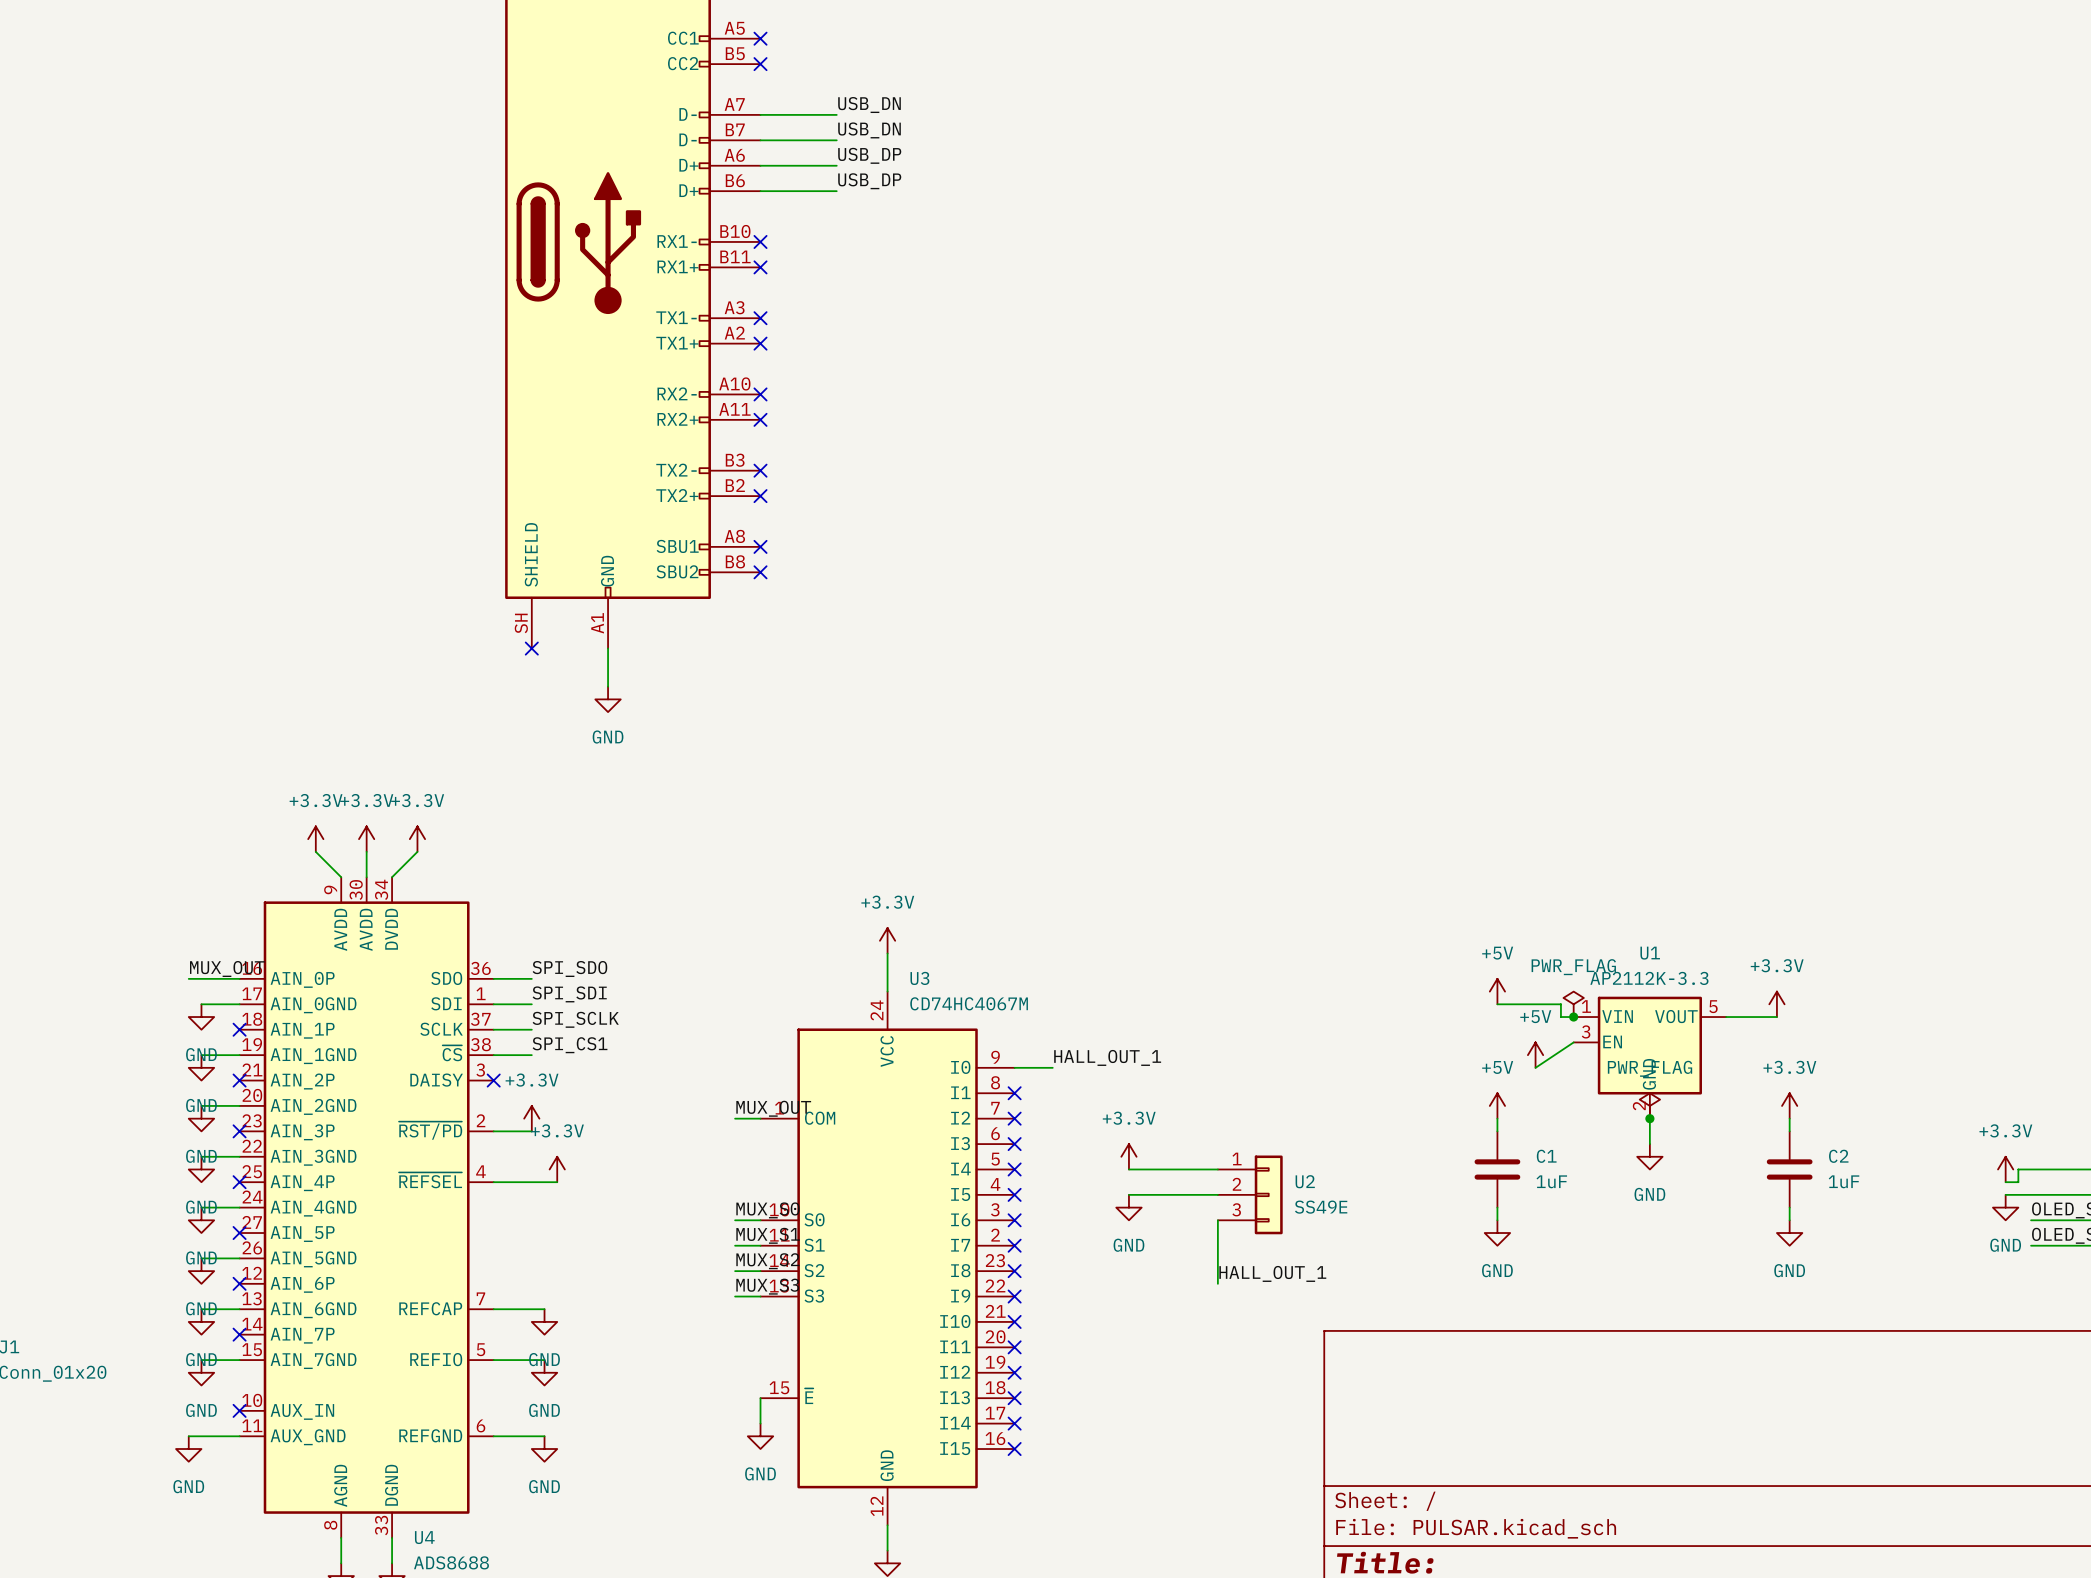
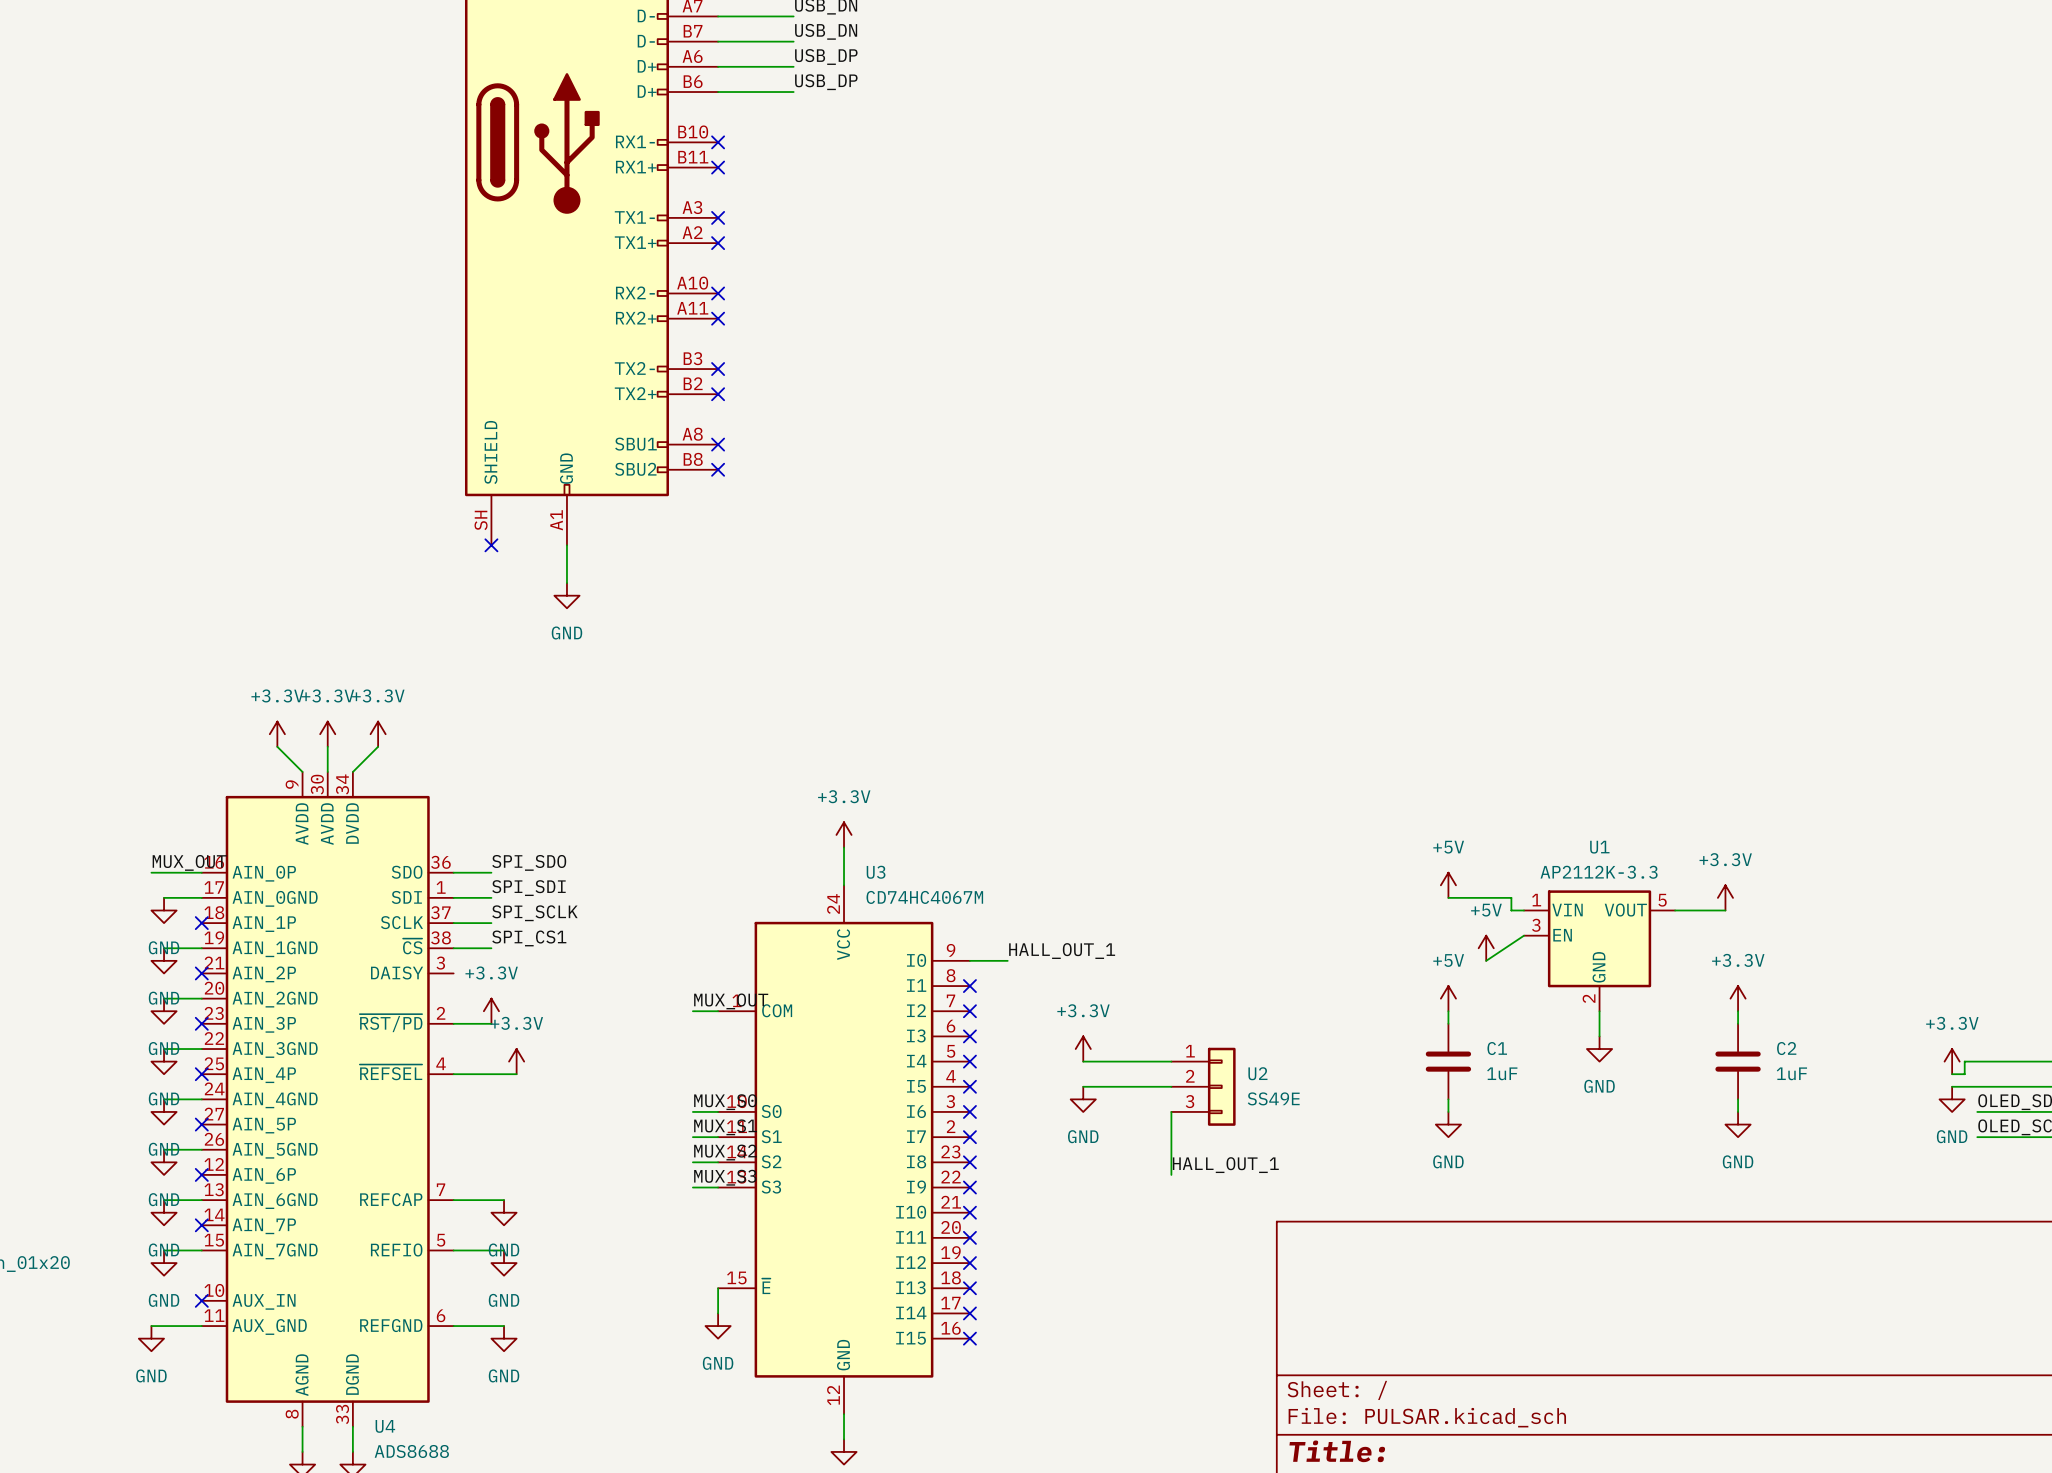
power symbol: PWR_FLAG (1573, 1004) -> none
junction: (1573, 1017) -> none
no-connect mark: (493, 1080) -> none
power symbol: PWR_FLAG (1649, 1105) -> none
junction: (1649, 1118) -> none

